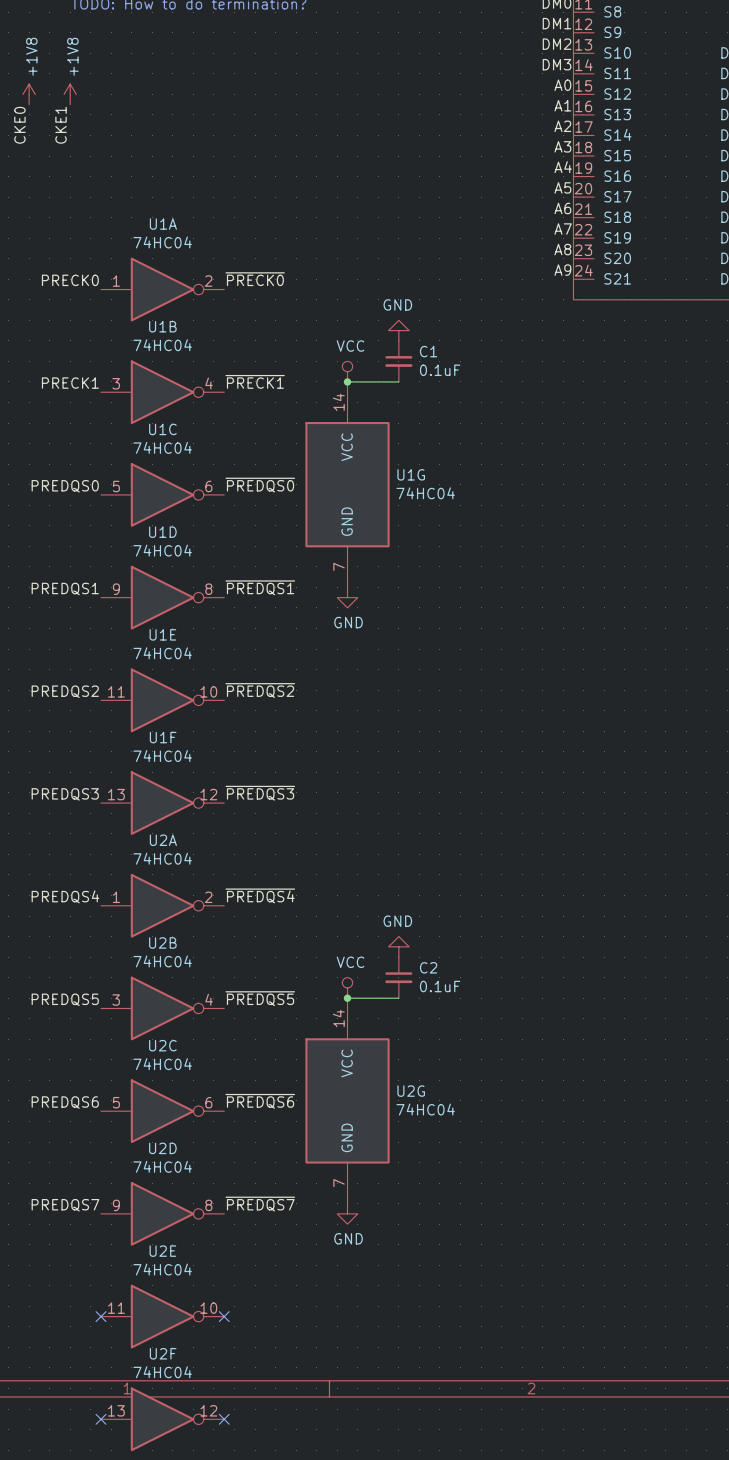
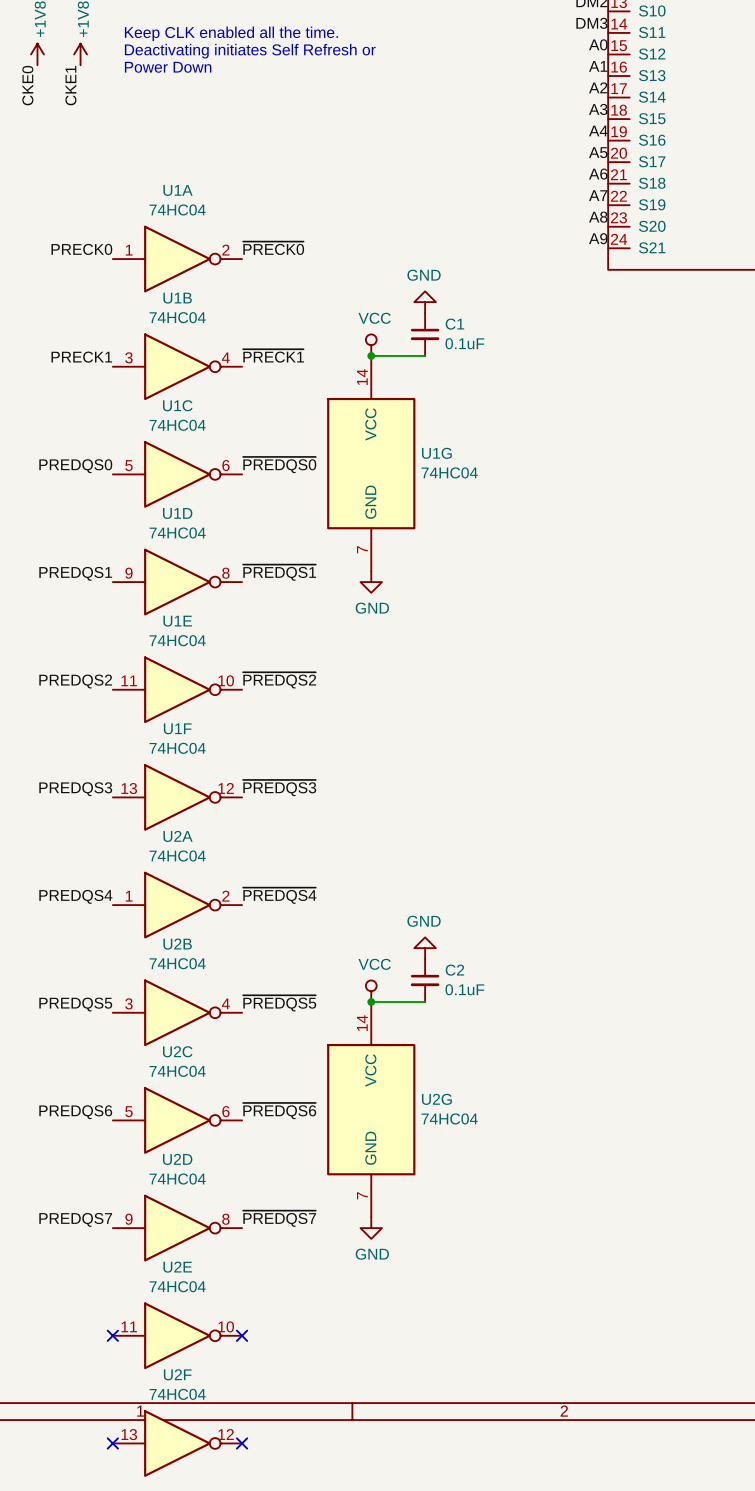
text: none -> Keep CLK enabled all the time. (231, 33)
text: none -> Deactivating initiates Self Refresh or (250, 51)
text: none -> Power Down (168, 67)

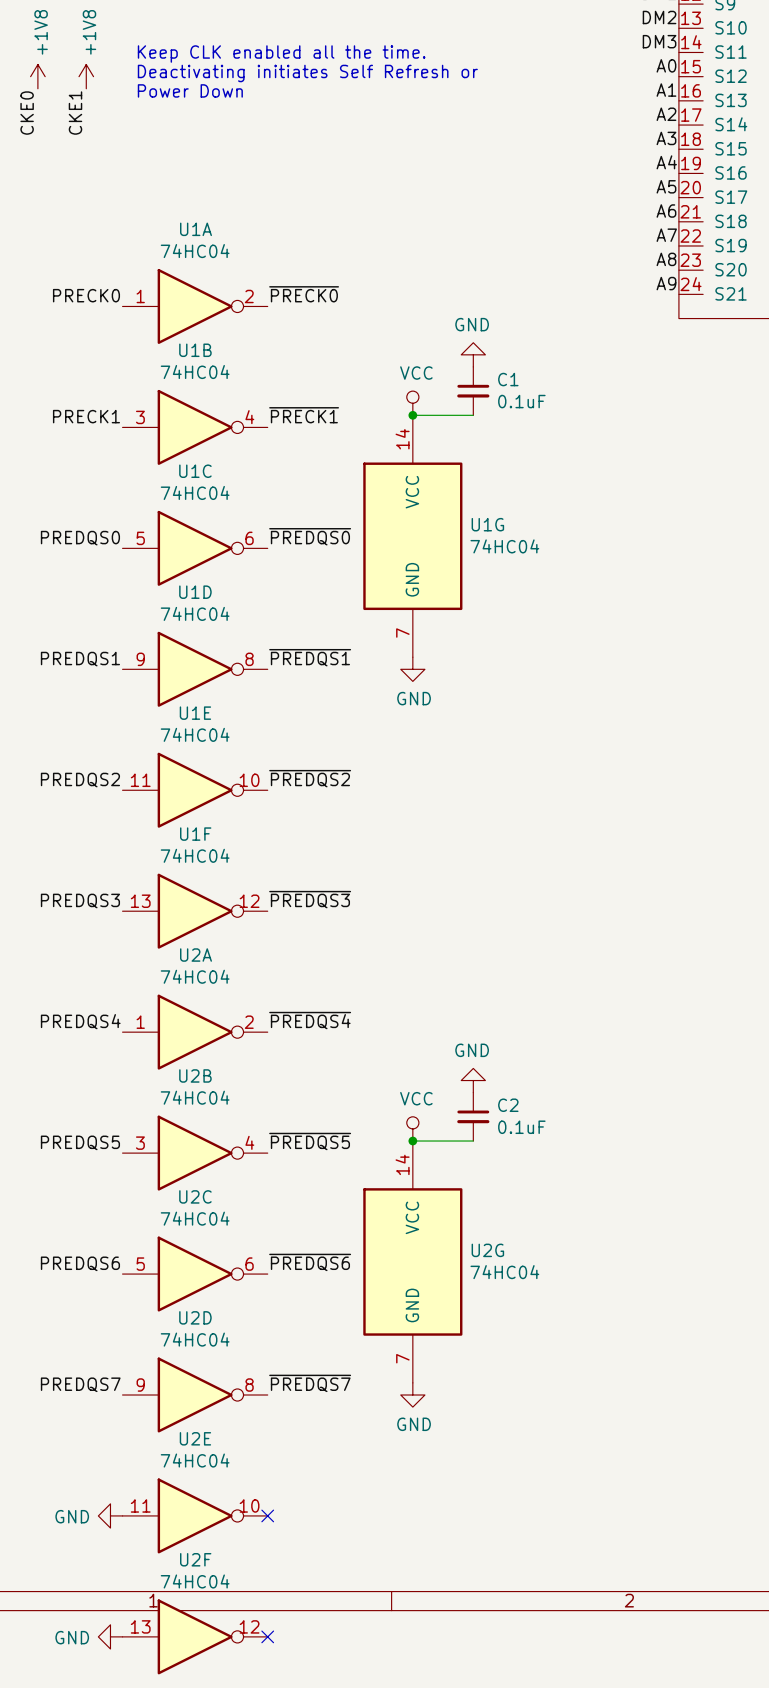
power symbol: none -> GND (110, 1515)
no-connect mark: (112, 1335) -> none
power symbol: none -> GND (110, 1636)
no-connect mark: (112, 1443) -> none

